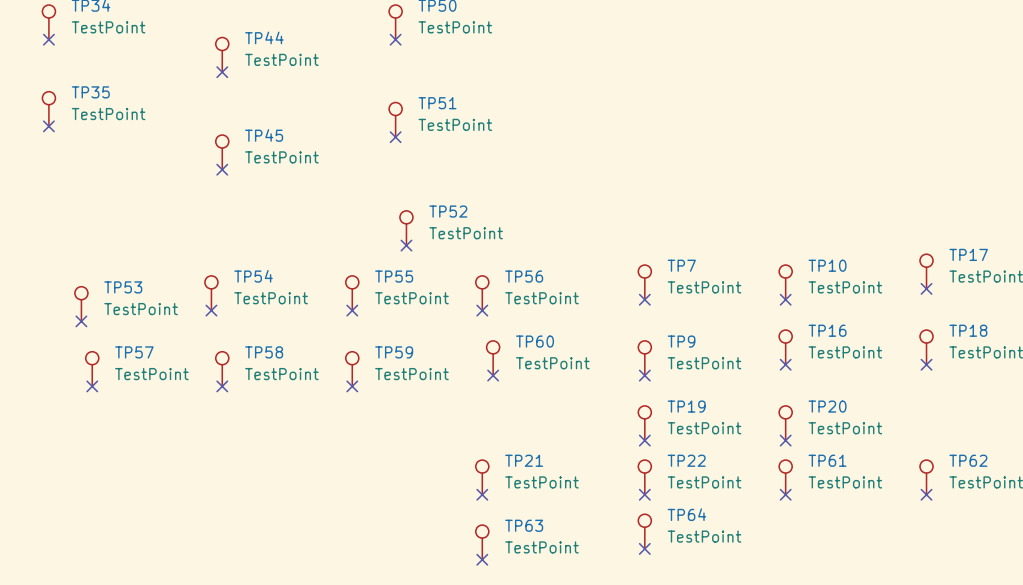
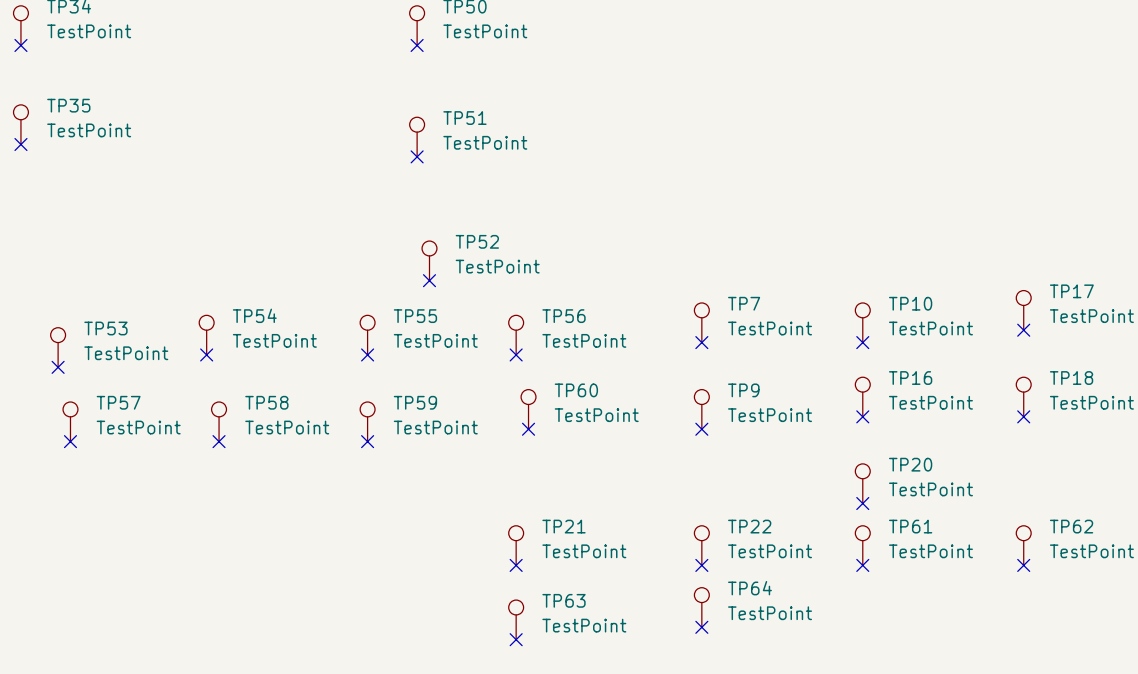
TP44: TestPoint (222, 54) -> none
no-connect mark: (222, 72) -> none
TP45: TestPoint (222, 152) -> none
no-connect mark: (222, 169) -> none
TP19: TestPoint (644, 423) -> none
no-connect mark: (644, 440) -> none

